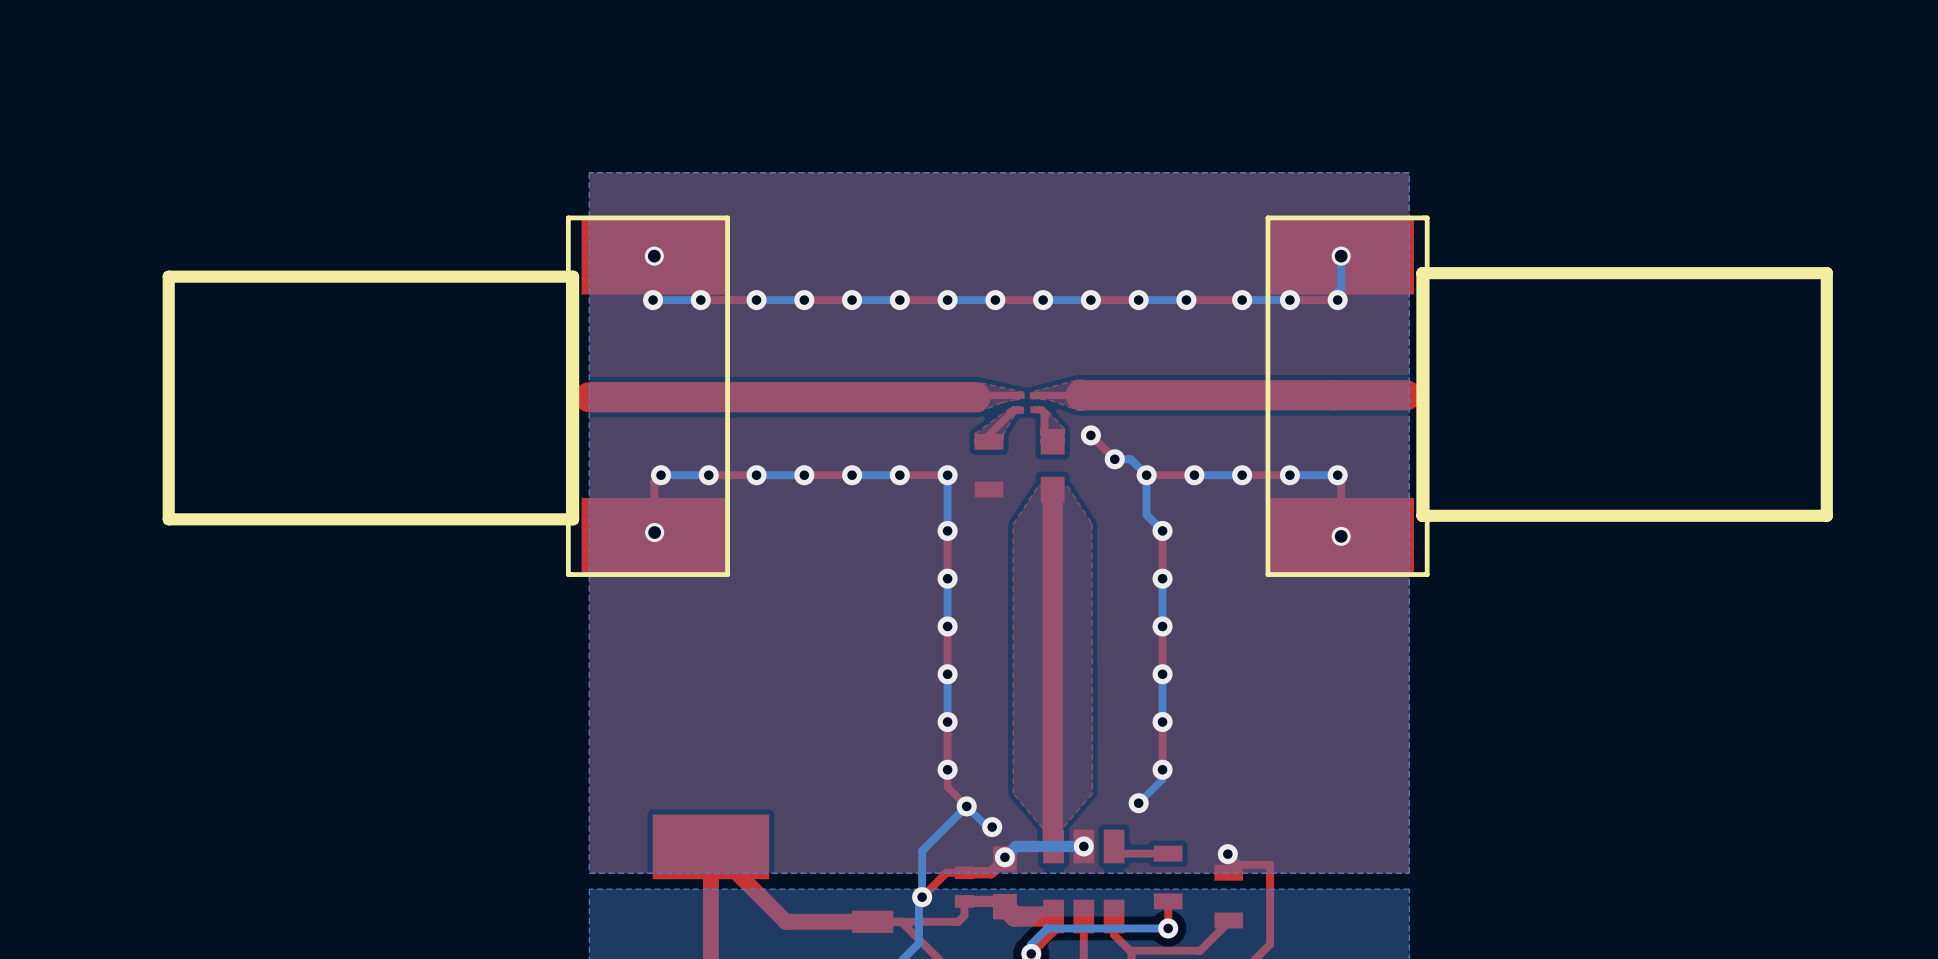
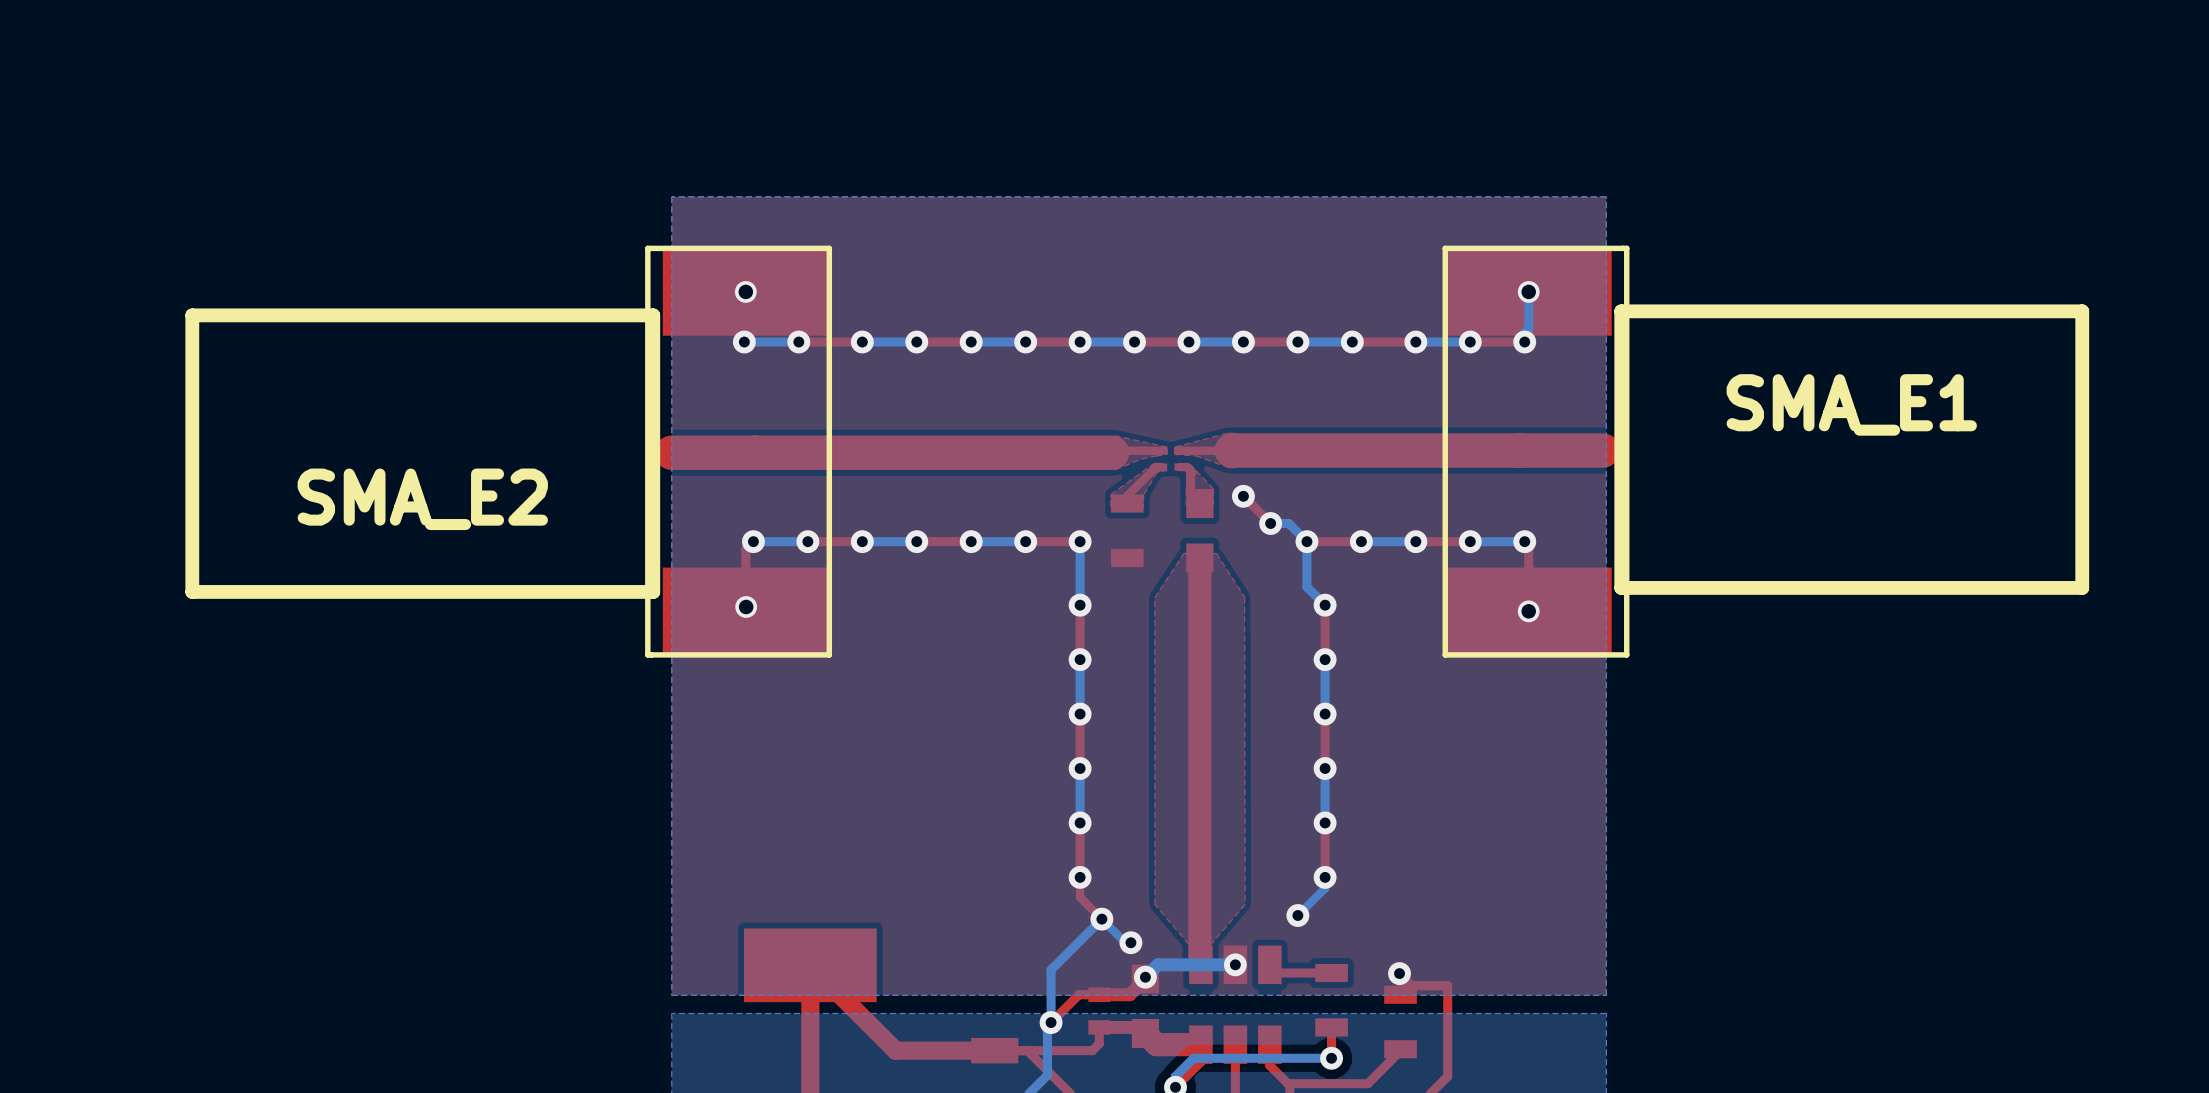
SMA_E1 name: none -> SMA_E1 (1851, 404)
SMA_E2 name: none -> SMA_E2 (422, 499)

